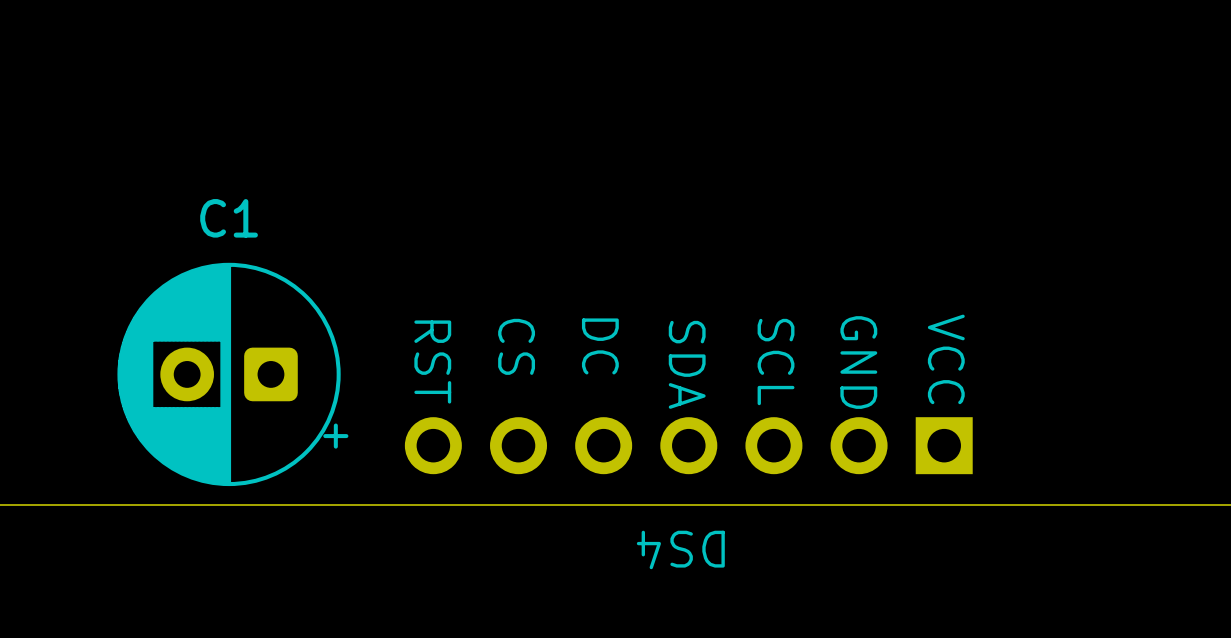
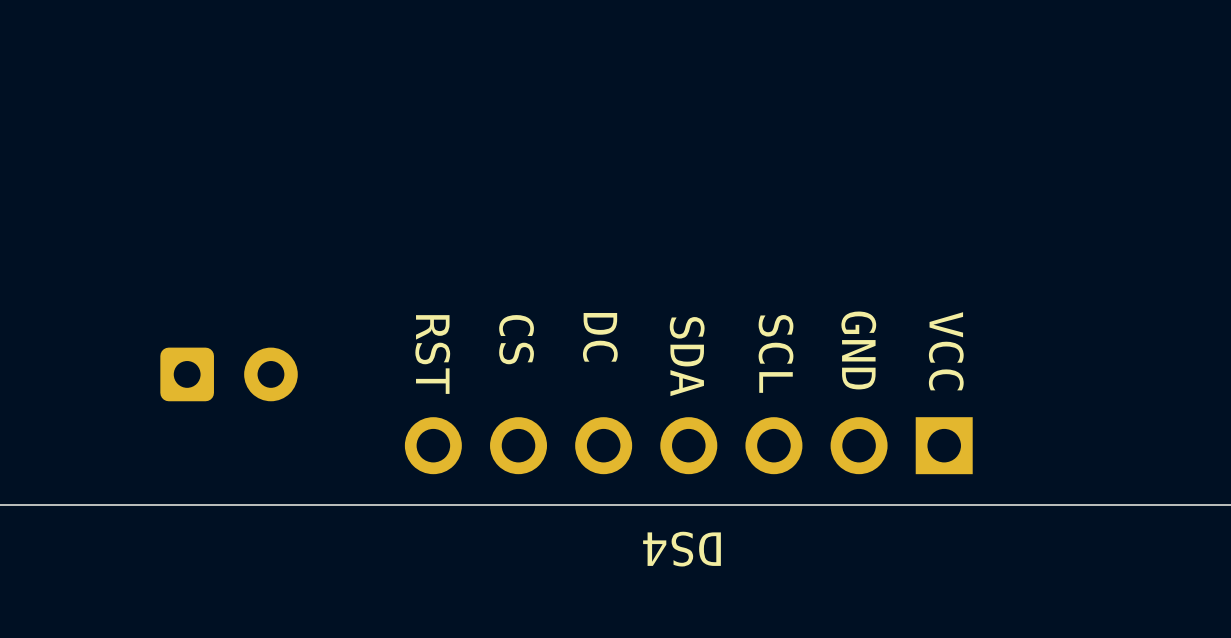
C1 side: top (232, 374) -> bottom (229, 374)

